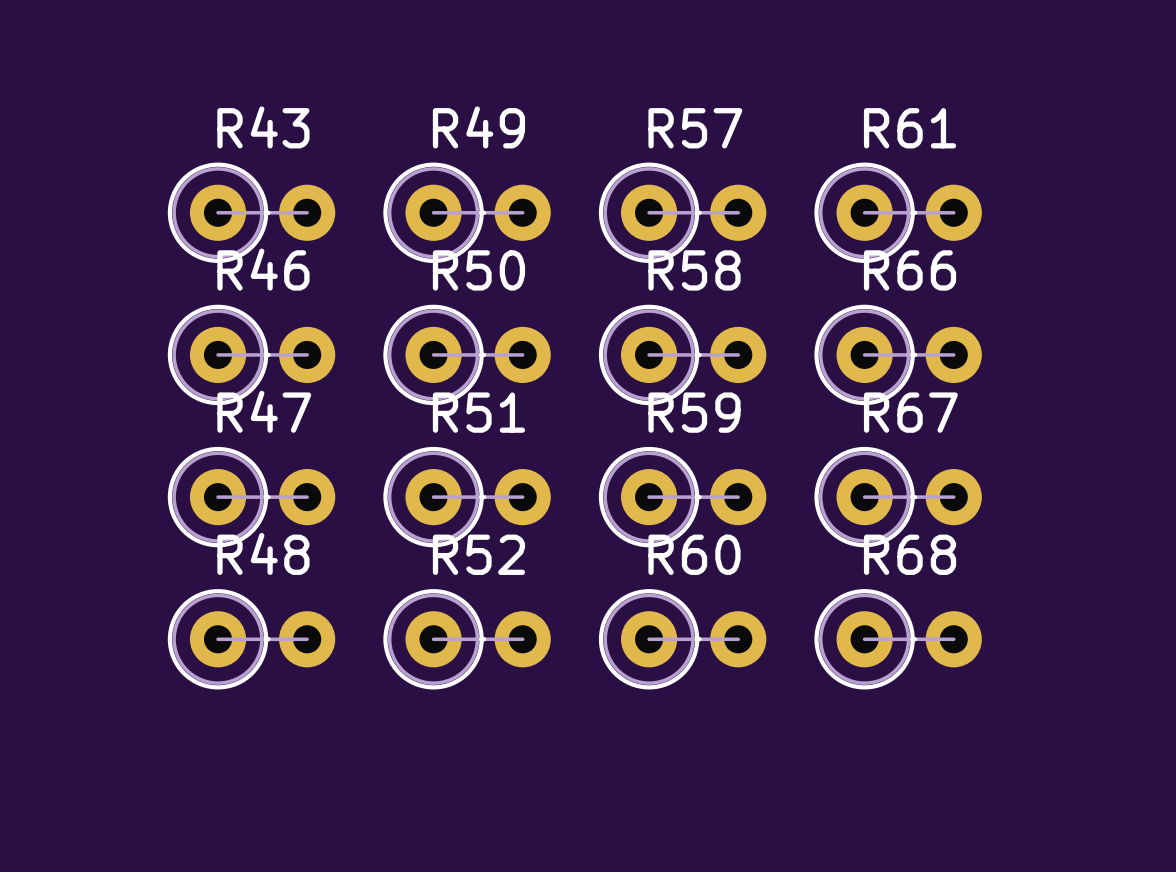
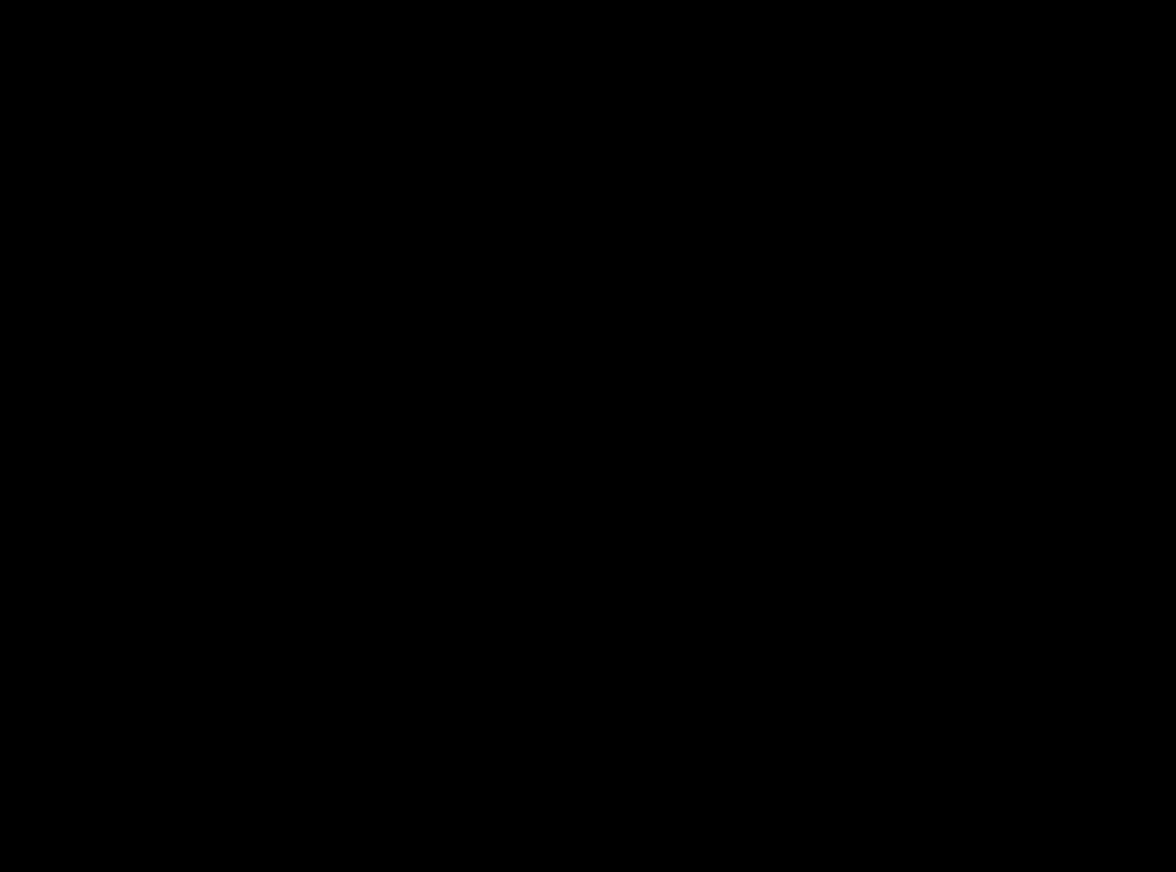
R43: (251, 212) -> none
R49: (467, 212) -> none
R57: (682, 212) -> none
R61: (898, 212) -> none
R46: (251, 354) -> none
R50: (467, 354) -> none
R58: (682, 354) -> none
R66: (898, 354) -> none
R47: (251, 497) -> none
R51: (467, 497) -> none
R59: (682, 497) -> none
R67: (898, 497) -> none
R48: (251, 639) -> none
R52: (467, 639) -> none
R60: (682, 639) -> none
R68: (898, 639) -> none

